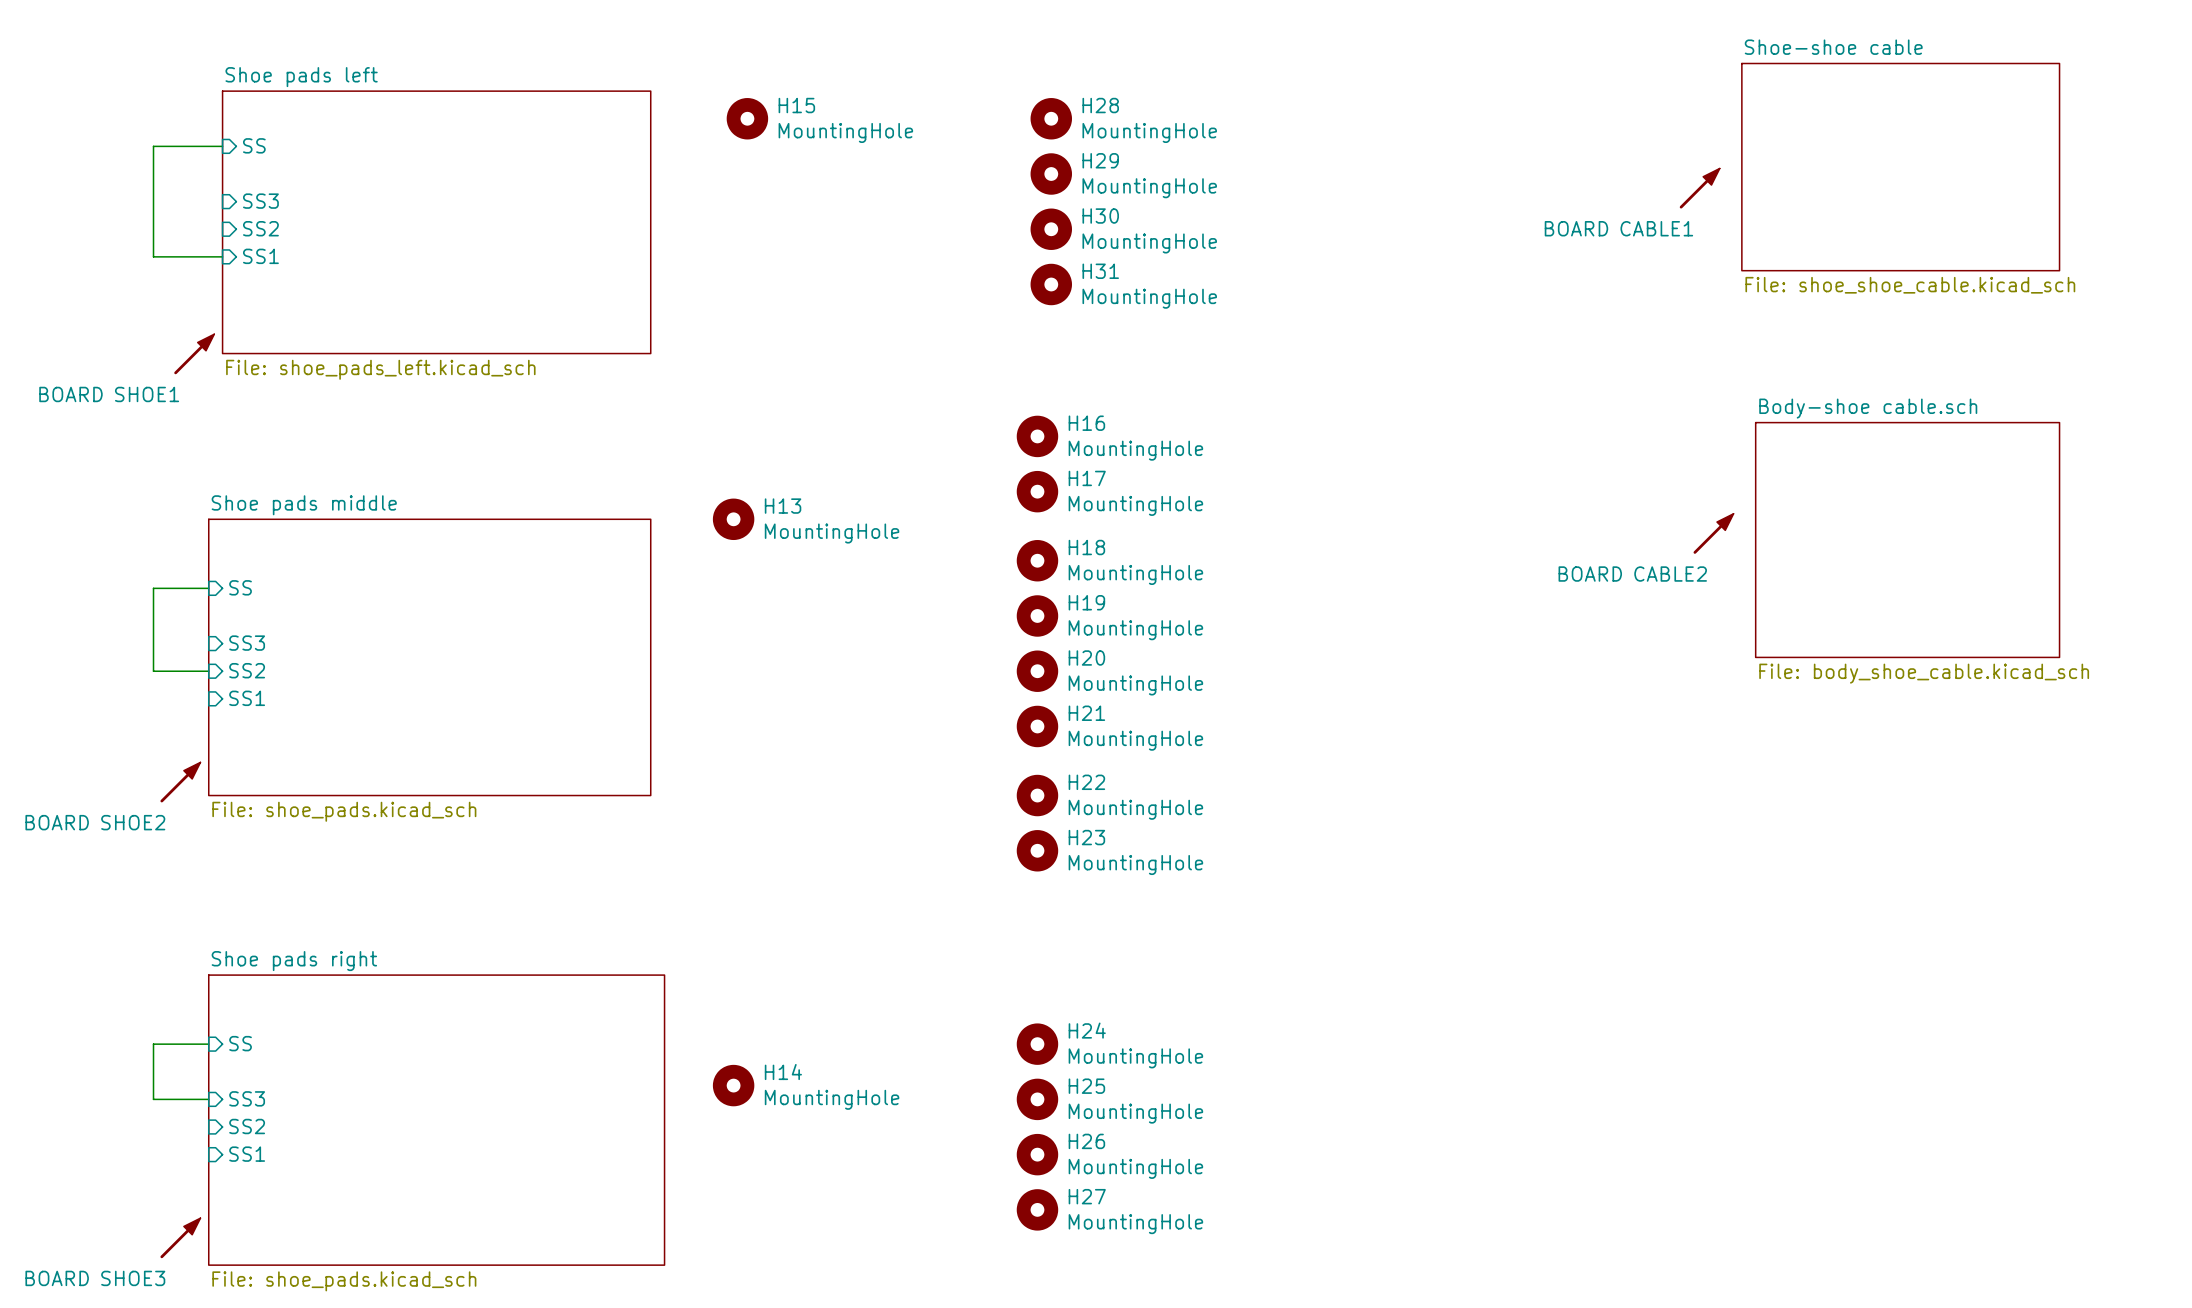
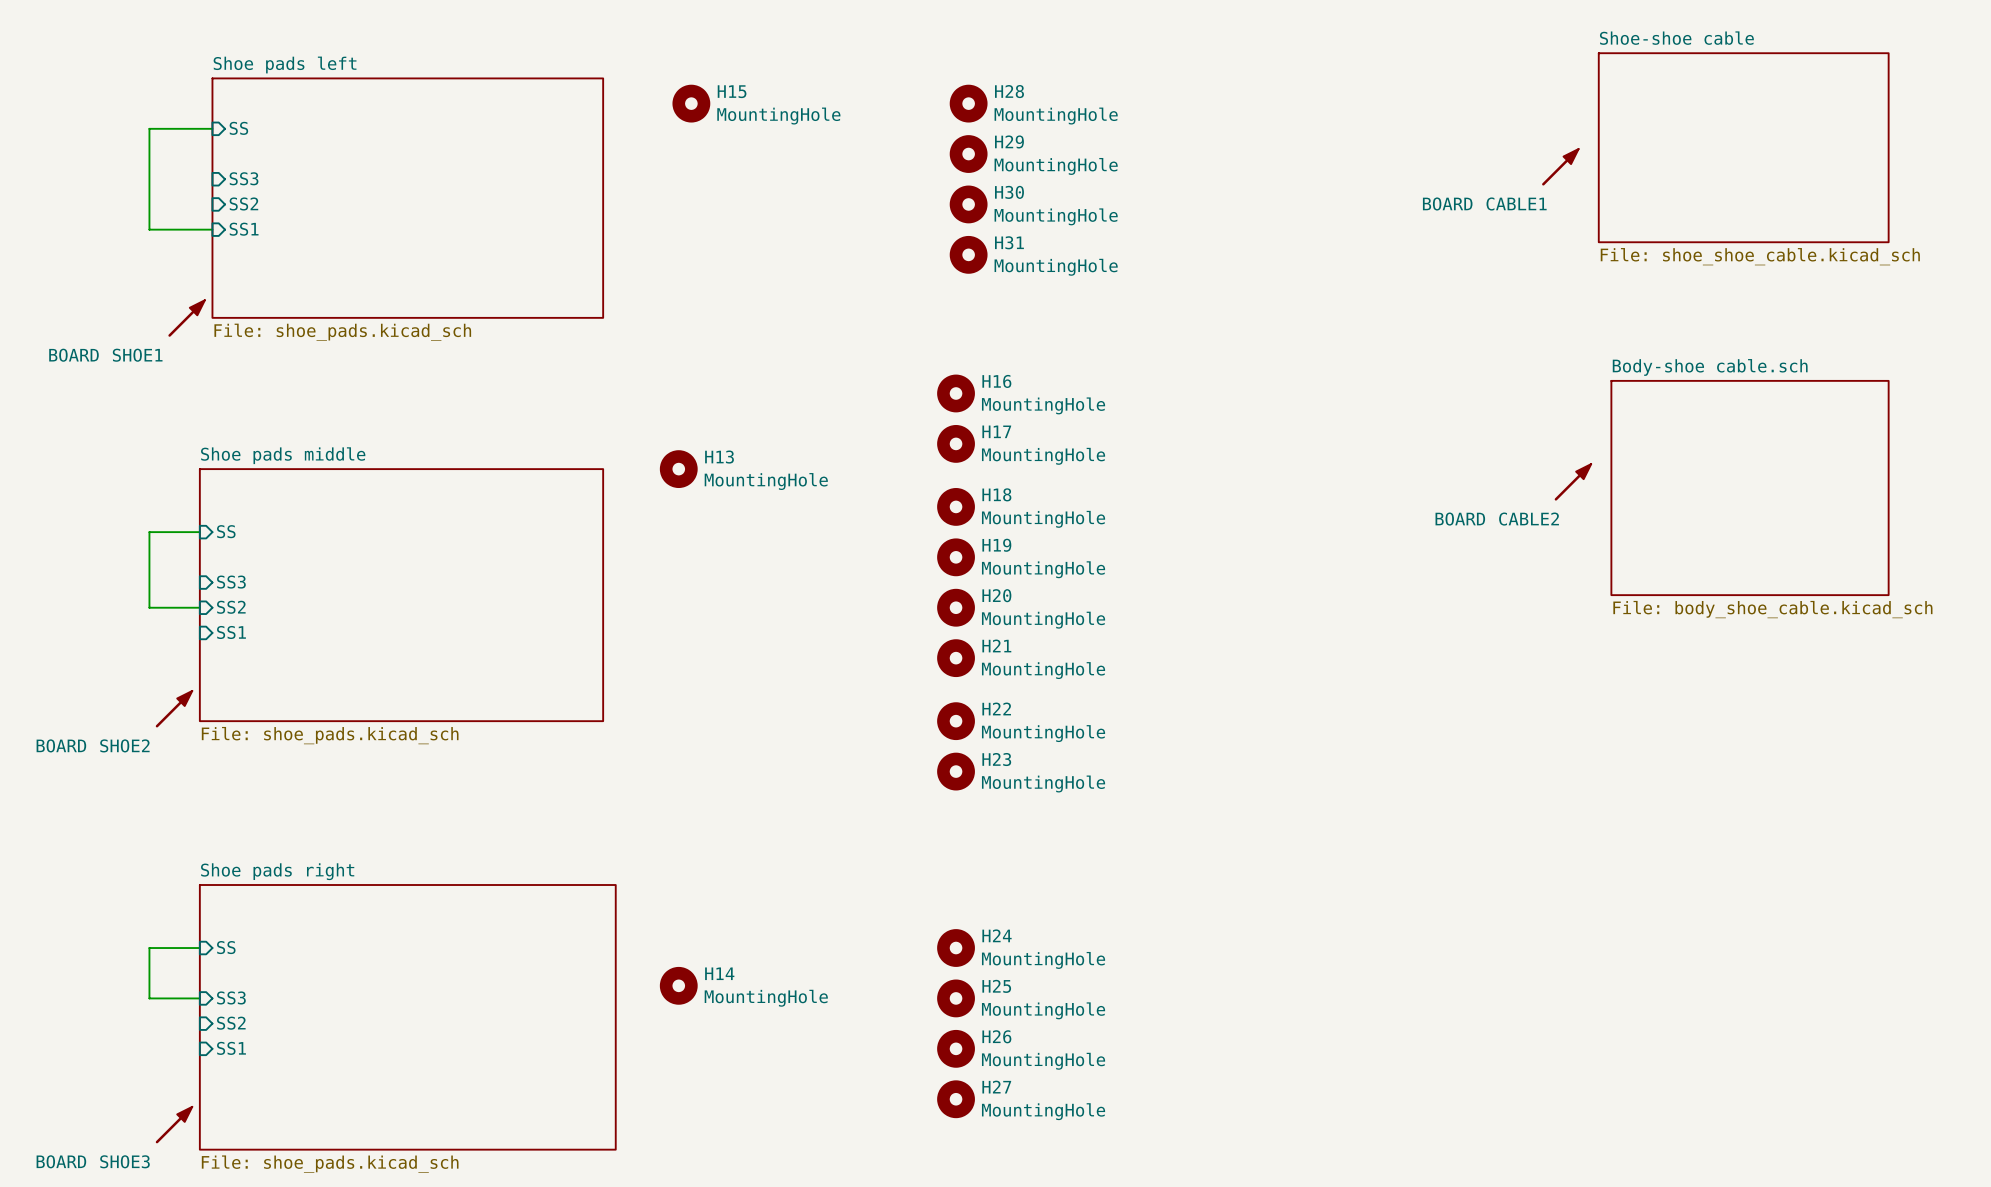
sheet Shoe pads left value: File: shoe_pads_left.kicad_sch (380, 369) -> File: shoe_pads.kicad_sch (342, 332)

